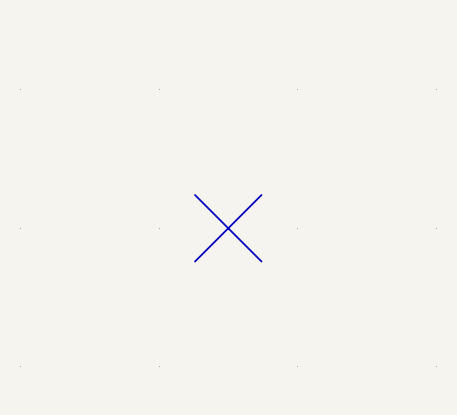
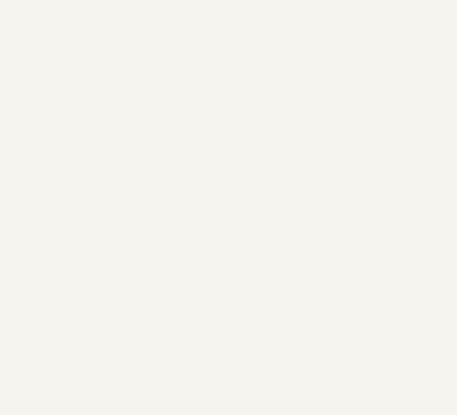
no-connect mark: (228, 228) -> none

